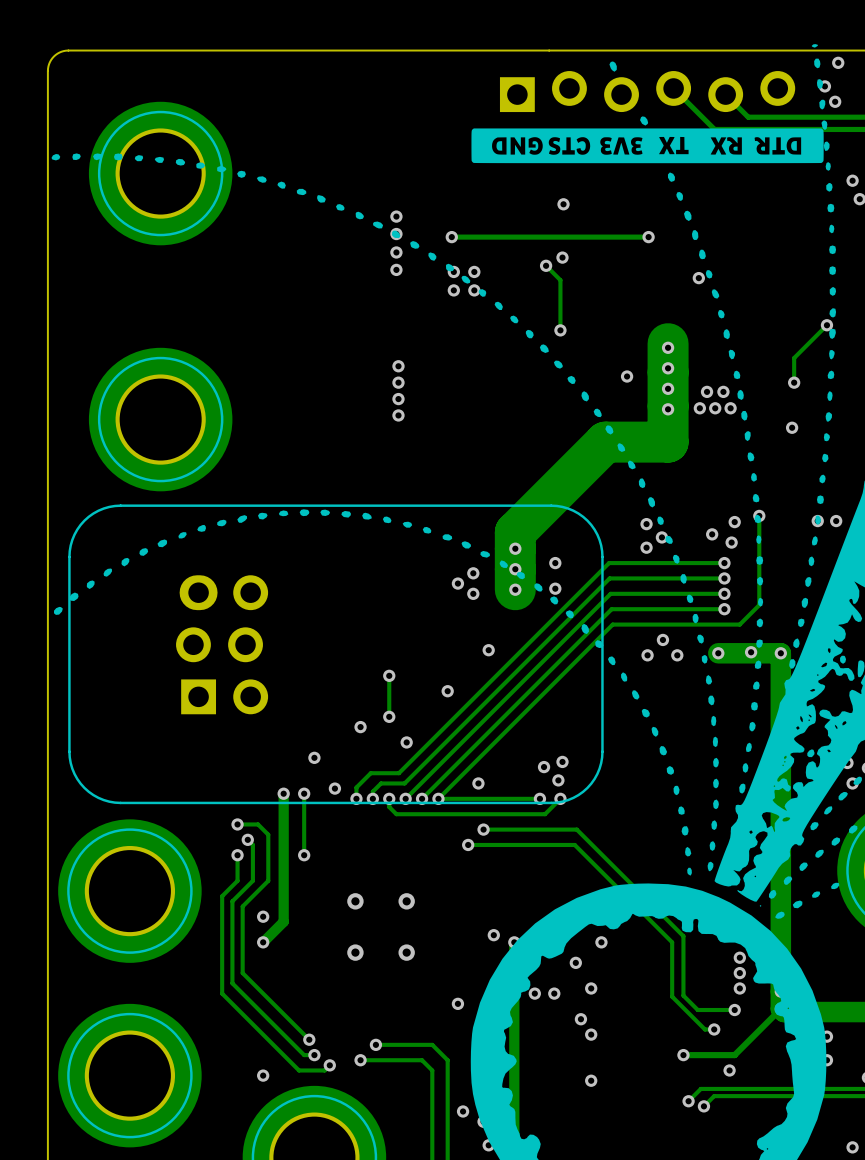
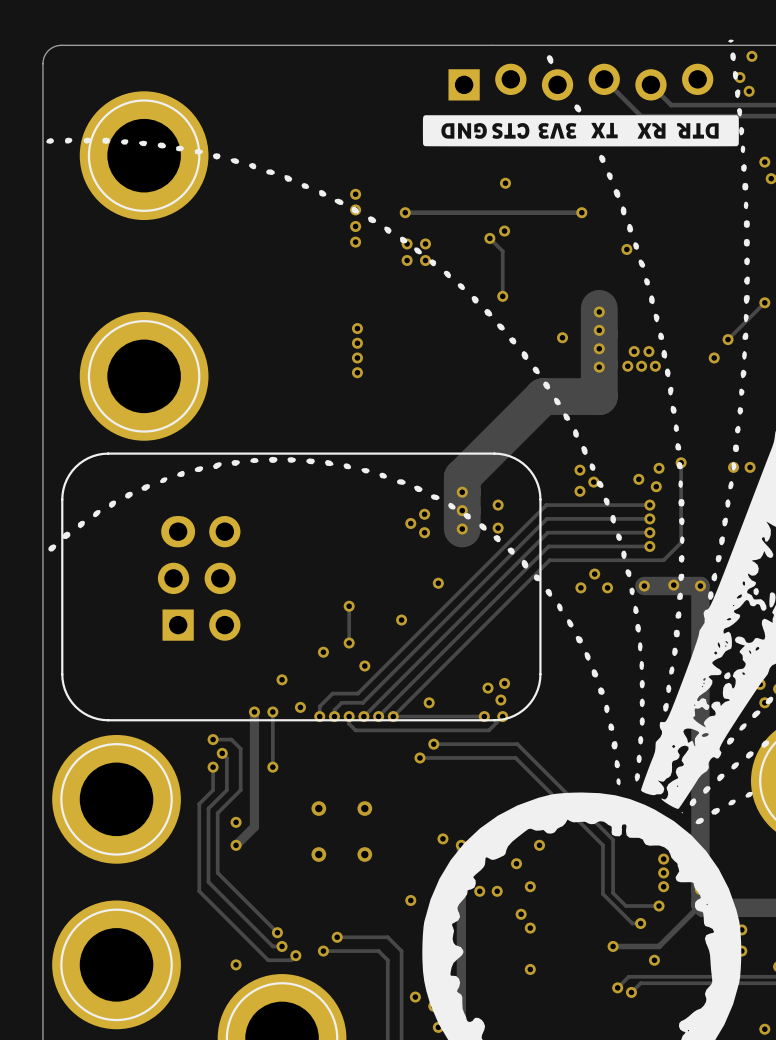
track: (826, 325) (794, 358) (794, 382) -> none
via: (826, 325) -> none
track: none -> (764, 302) (728, 339)
via: none -> (764, 302)
via: none -> (728, 339)
via: (794, 382) -> none
via: none -> (714, 357)
via: (792, 427) -> none

